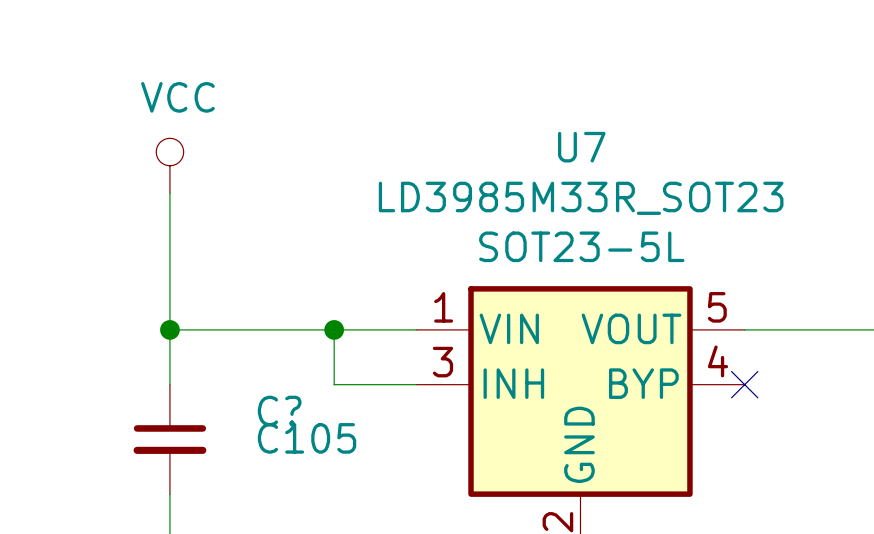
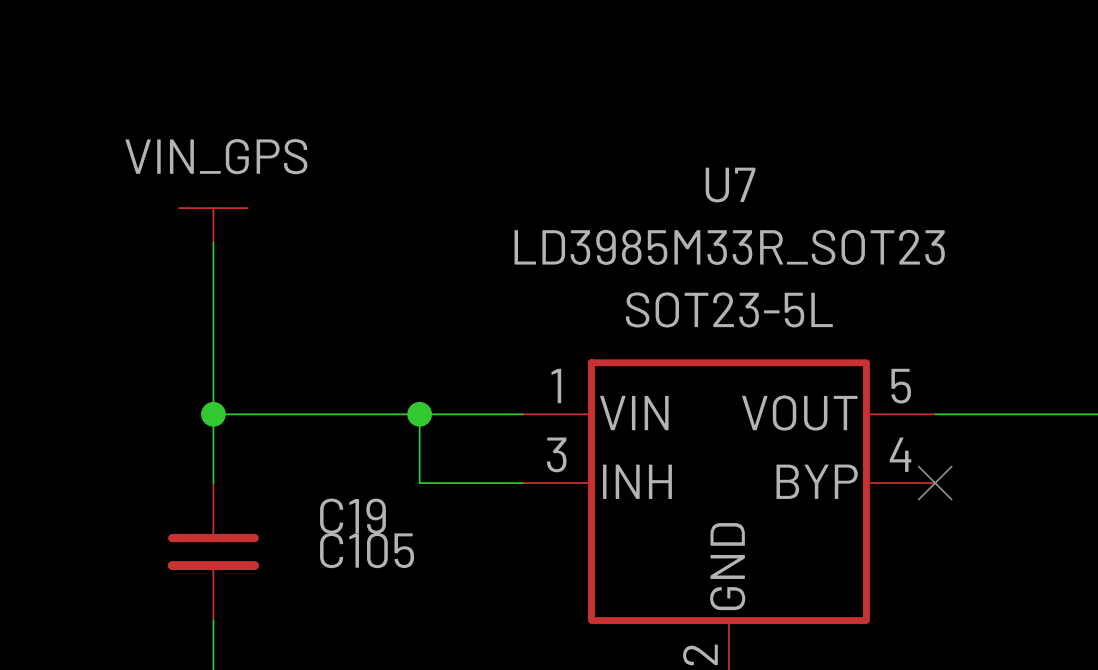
power symbol: VCC (169, 165) -> VIN_GPS (213, 225)
C? name: C? (279, 411) -> C19 (352, 516)

